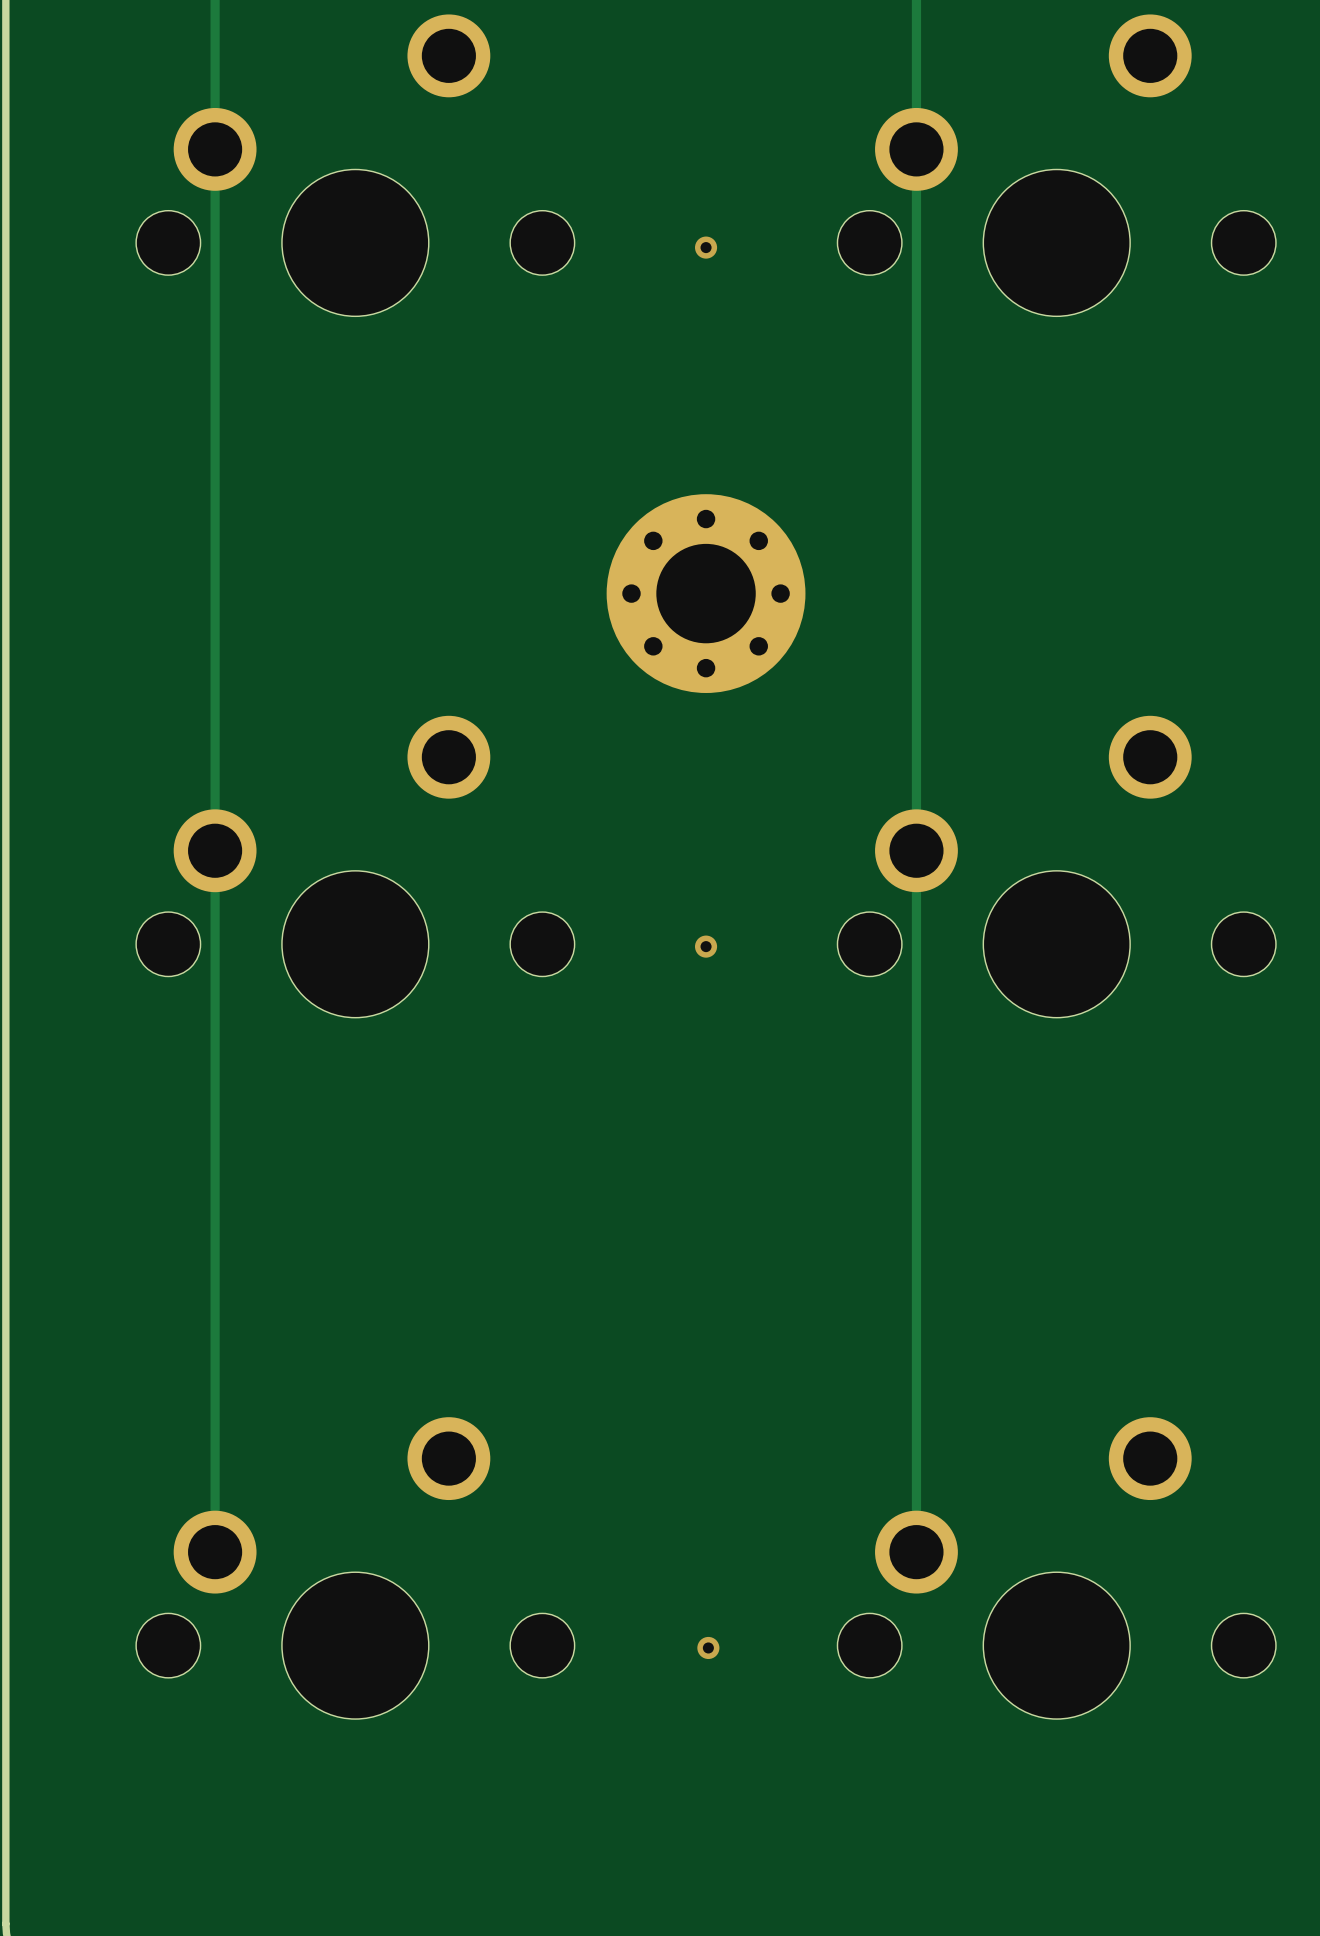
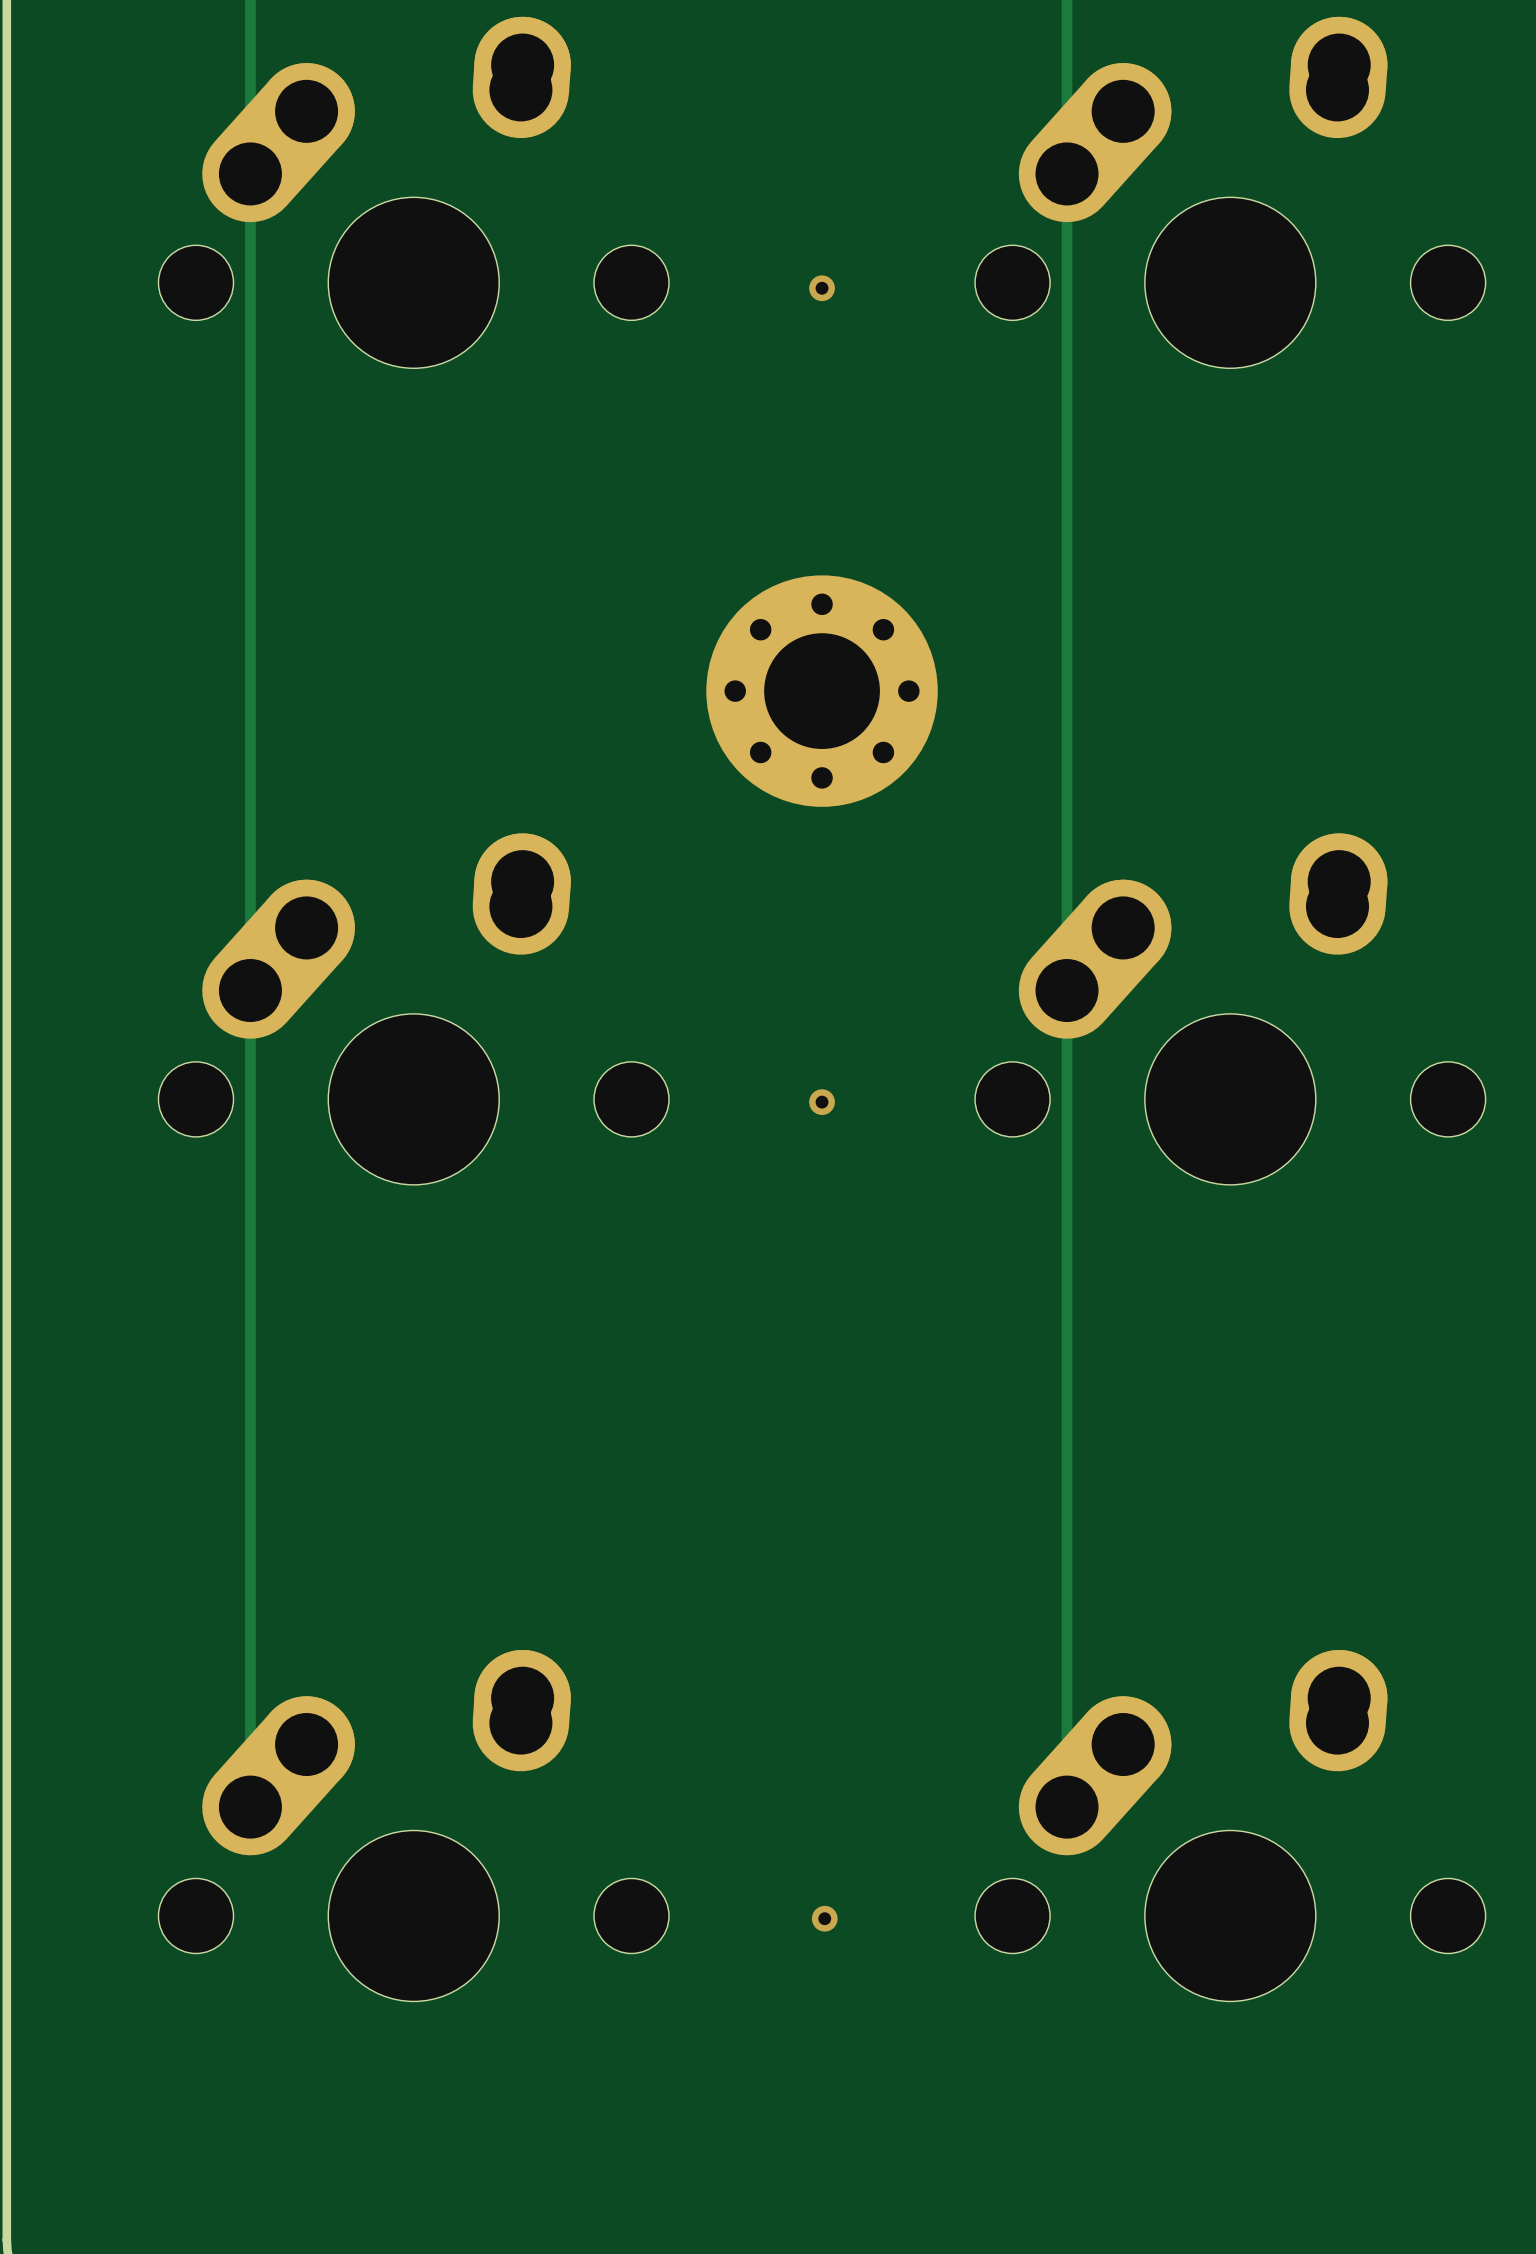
part footprint: [136, 14, 575, 317] -> [158, 16, 670, 369]
part footprint: [837, 14, 1276, 317] -> [975, 16, 1486, 369]
part footprint: [136, 715, 575, 1018] -> [158, 833, 670, 1185]
part footprint: [837, 715, 1276, 1018] -> [975, 833, 1486, 1185]
part footprint: [136, 1417, 575, 1720] -> [158, 1650, 670, 2002]
part footprint: [837, 1417, 1276, 1720] -> [975, 1650, 1486, 2002]

